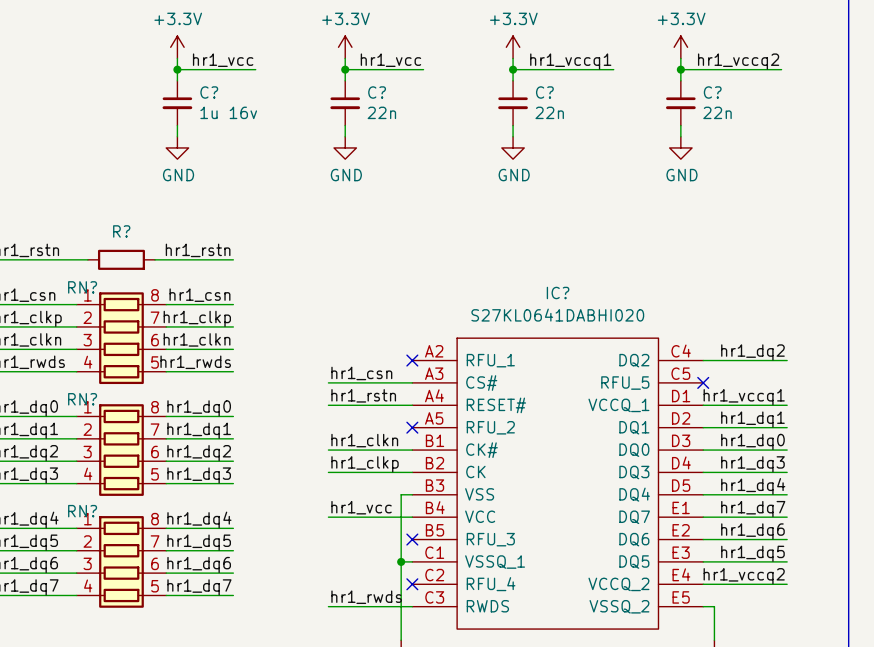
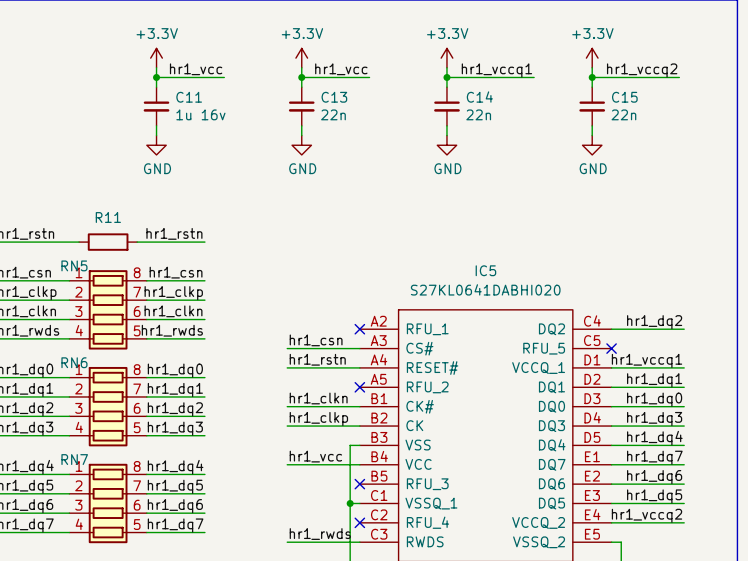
C? name: C? (209, 92) -> C11 (189, 97)
C? name: C? (377, 92) -> C13 (334, 97)
C? name: C? (544, 92) -> C14 (479, 97)
C? name: C? (712, 92) -> C15 (624, 97)
R? name: R? (121, 231) -> R11 (108, 217)
RN? name: RN? (82, 287) -> RN5 (74, 265)
IC? name: IC? (558, 292) -> IC5 (485, 270)
RN? name: RN? (82, 399) -> RN6 (74, 362)
RN? name: RN? (82, 511) -> RN7 (74, 459)

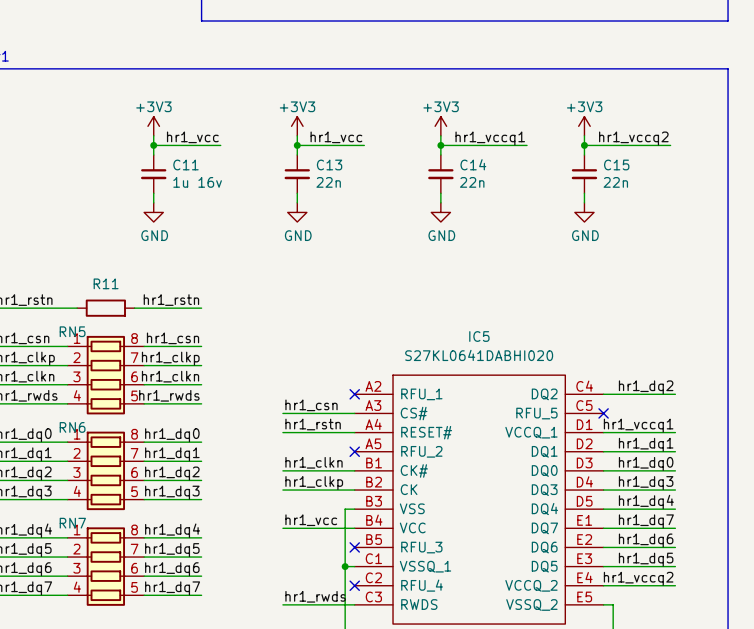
power symbol: +3.3V (156, 58) -> +3V3 (153, 126)
power symbol: +3.3V (301, 58) -> +3V3 (297, 126)
power symbol: +3.3V (446, 58) -> +3V3 (440, 126)
power symbol: +3.3V (592, 58) -> +3V3 (584, 126)

